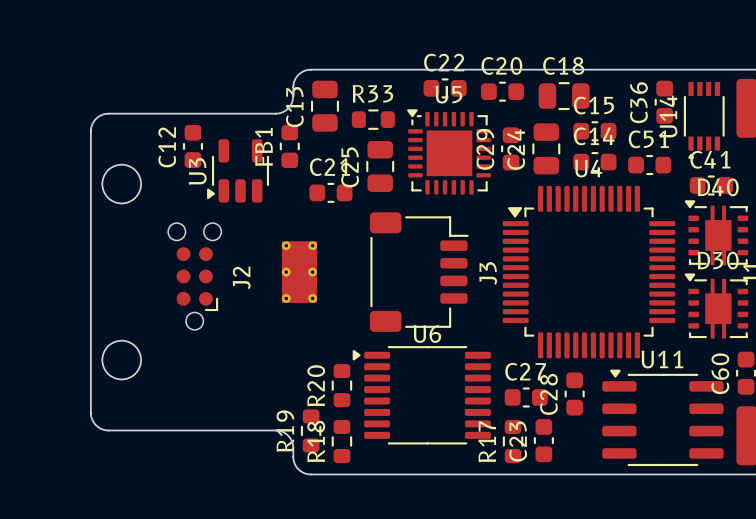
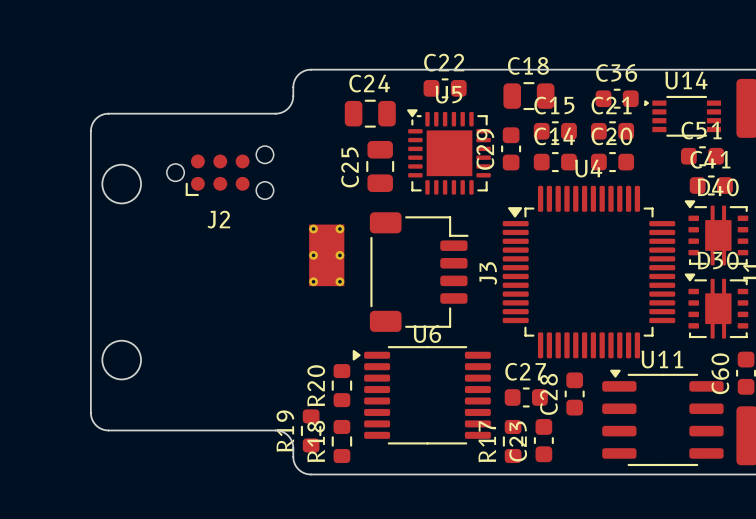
C20 position: (502, 91) -> (612, 162)
C18 position: (564, 96) -> (528, 96)
C36 rotation: 0° (664, 102) -> 90° clockwise (617, 98)
C36 position: (664, 102) -> (617, 98)
C13: (324, 106) -> none
R33: (373, 119) -> none
U14 rotation: 0° (704, 120) -> 90° clockwise (682, 116)
C15 position: (594, 131) -> (555, 131)
C12: (192, 146) -> none
FB1: (289, 146) -> none
C24 rotation: 0° (546, 148) -> 90° clockwise (370, 113)
C24 position: (546, 148) -> (370, 113)
C14 position: (594, 162) -> (555, 162)
C51 position: (649, 165) -> (702, 156)
U3: (238, 170) -> none
C21 position: (330, 192) -> (612, 131)
part position: (299, 272) -> (326, 255)
J2 rotation: 0° (194, 276) -> 90° clockwise (220, 172)
J2 position: (194, 276) -> (220, 172)

